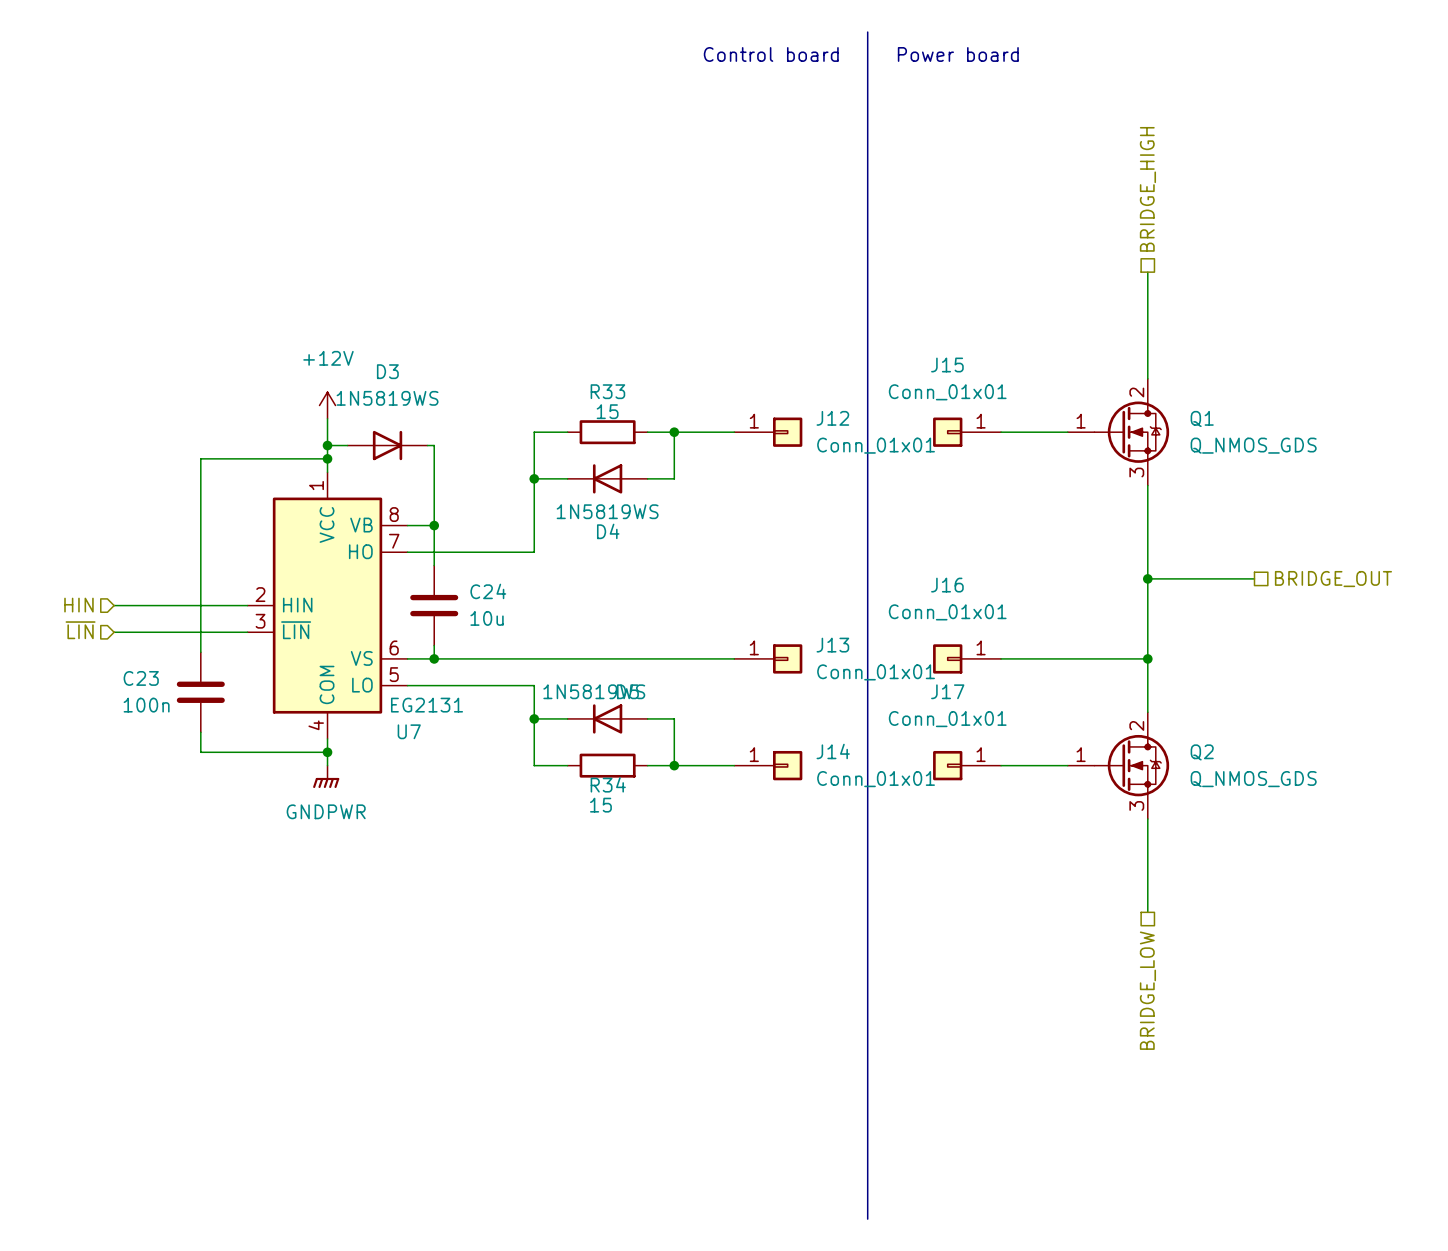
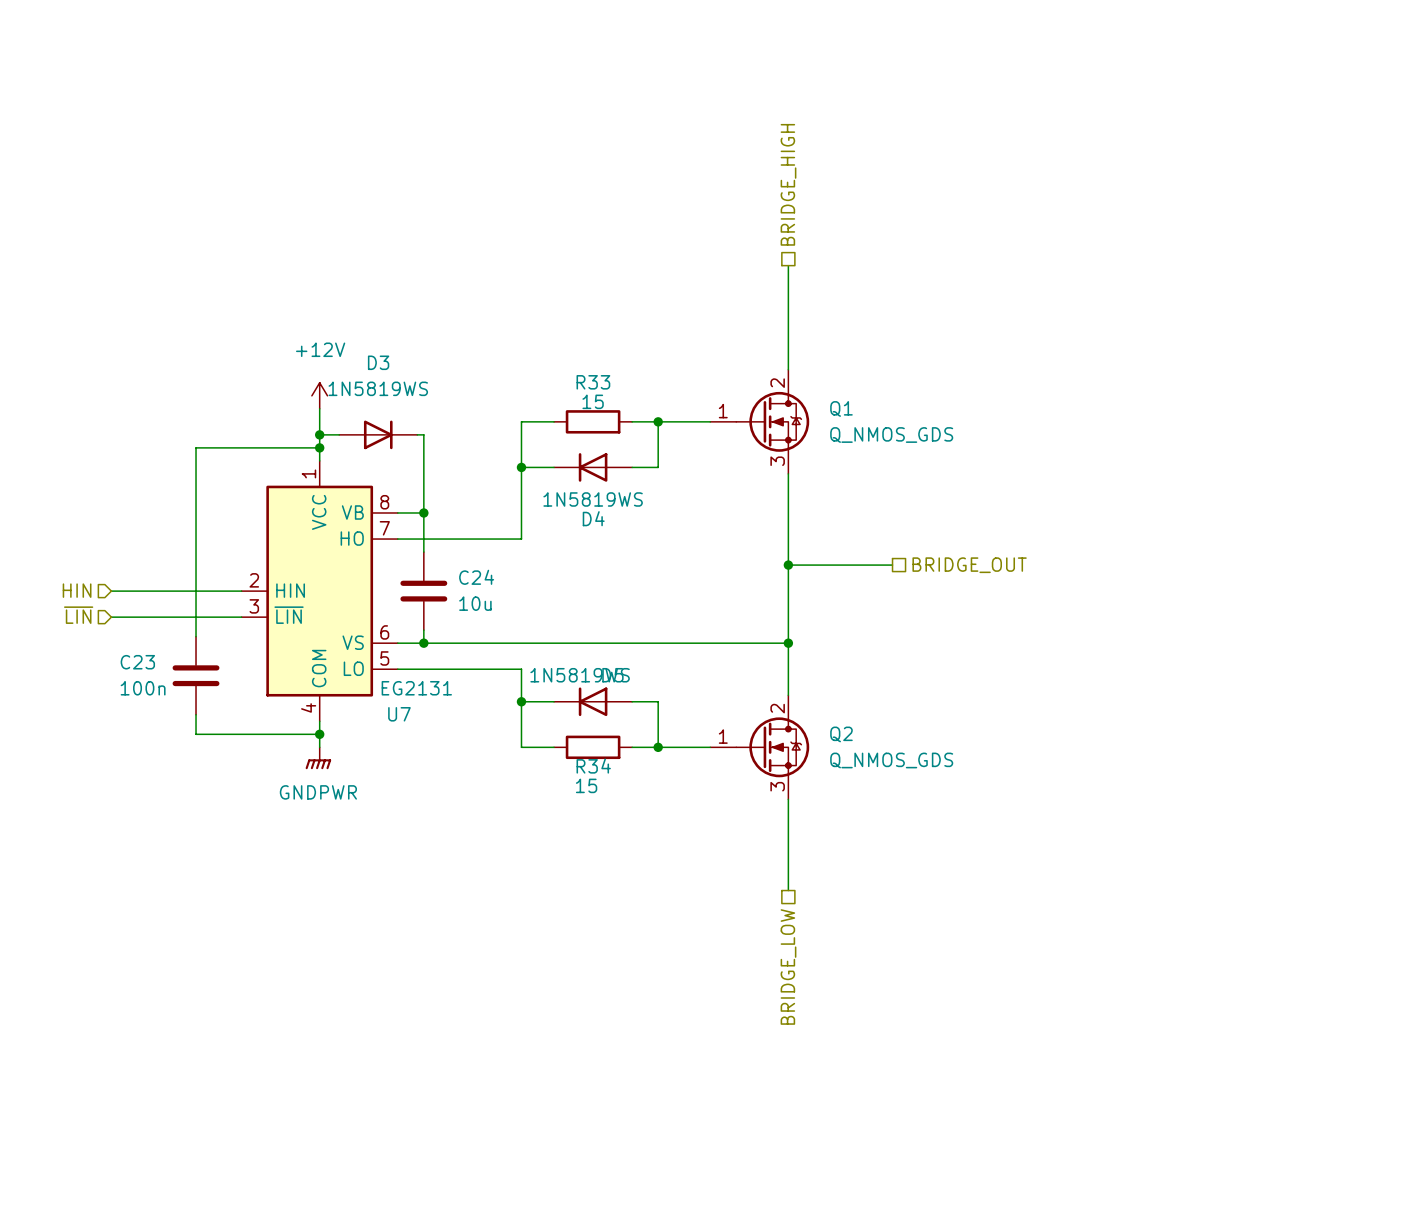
line: (867, 32) (867, 1219) -> none
text: Control board (771, 54) -> none
text: Power board (958, 54) -> none
hierarchical label: none -> BRIDGE_HIGH (788, 184)
hierarchical label: BRIDGE_HIGH (1147, 189) -> none
wire: none -> (788, 265) (788, 369)
wire: (1147, 272) (1147, 378) -> none
J12: Conn_01x01 (768, 432) -> none
J15: Conn_01x01 (967, 432) -> none
wire: (1001, 432) (1067, 432) -> none
Q1 position: (1118, 432) -> (759, 421)
wire: none -> (788, 473) (788, 695)
wire: (1147, 485) (1147, 712) -> none
wire: none -> (788, 565) (892, 565)
junction: none -> (788, 565)
wire: (1147, 578) (1254, 578) -> none
junction: (1147, 578) -> none
hierarchical label: none -> BRIDGE_OUT (969, 565)
hierarchical label: BRIDGE_OUT (1333, 579) -> none
J13: Conn_01x01 (768, 658) -> none
junction: none -> (788, 643)
J16: Conn_01x01 (967, 658) -> none
wire: (1001, 658) (1147, 658) -> none
junction: (1147, 658) -> none
J14: Conn_01x01 (768, 765) -> none
J17: Conn_01x01 (967, 765) -> none
wire: (1001, 765) (1067, 765) -> none
Q2 position: (1118, 765) -> (759, 747)
wire: none -> (788, 799) (788, 890)
wire: (1147, 818) (1147, 912) -> none
hierarchical label: none -> BRIDGE_LOW (788, 967)
hierarchical label: BRIDGE_LOW (1147, 990) -> none

